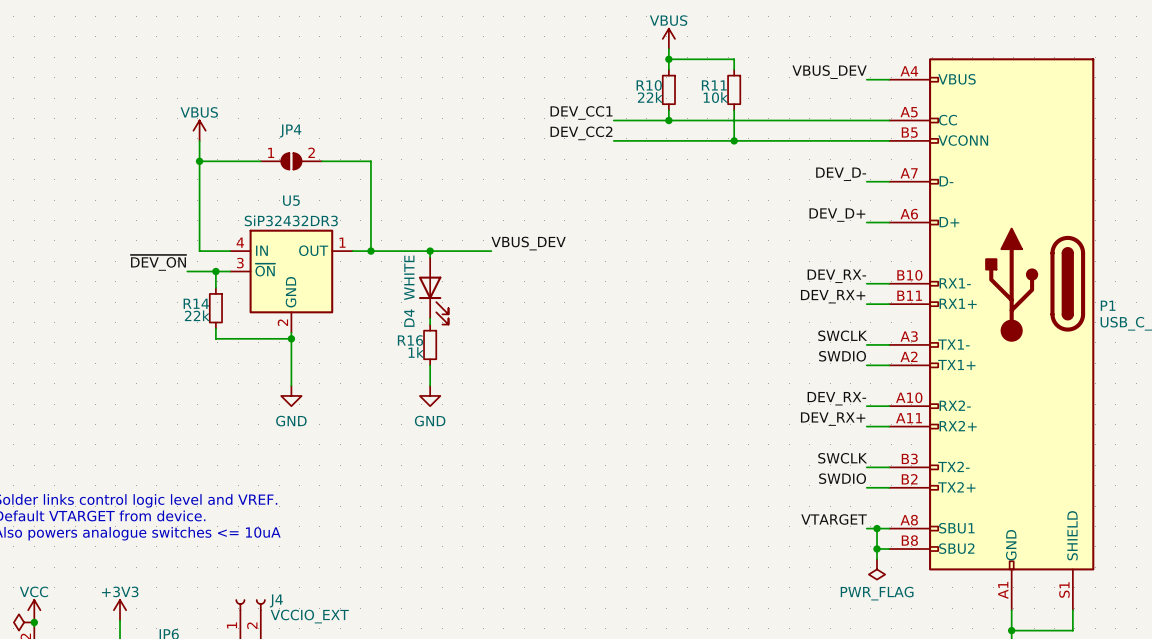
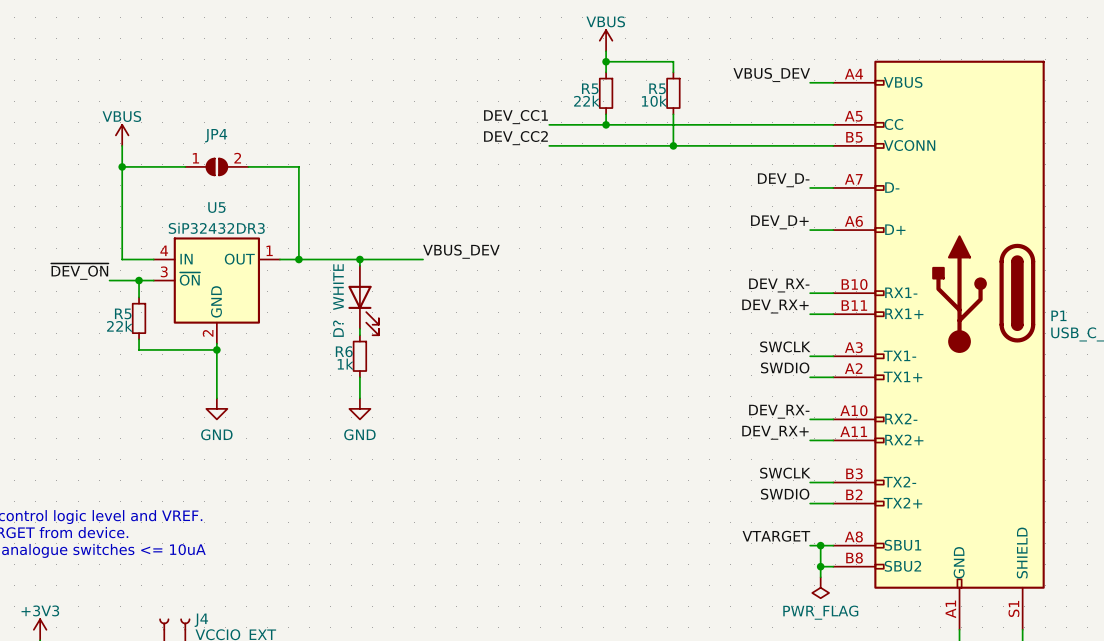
R10 name: R10 (649, 85) -> R5 (590, 88)
R11 name: R11 (714, 85) -> R5 (657, 88)
R14 name: R14 (196, 303) -> R5 (123, 313)
D4 name: D4 (409, 318) -> D? (338, 328)
R16 name: R16 (410, 340) -> R6 (344, 351)

